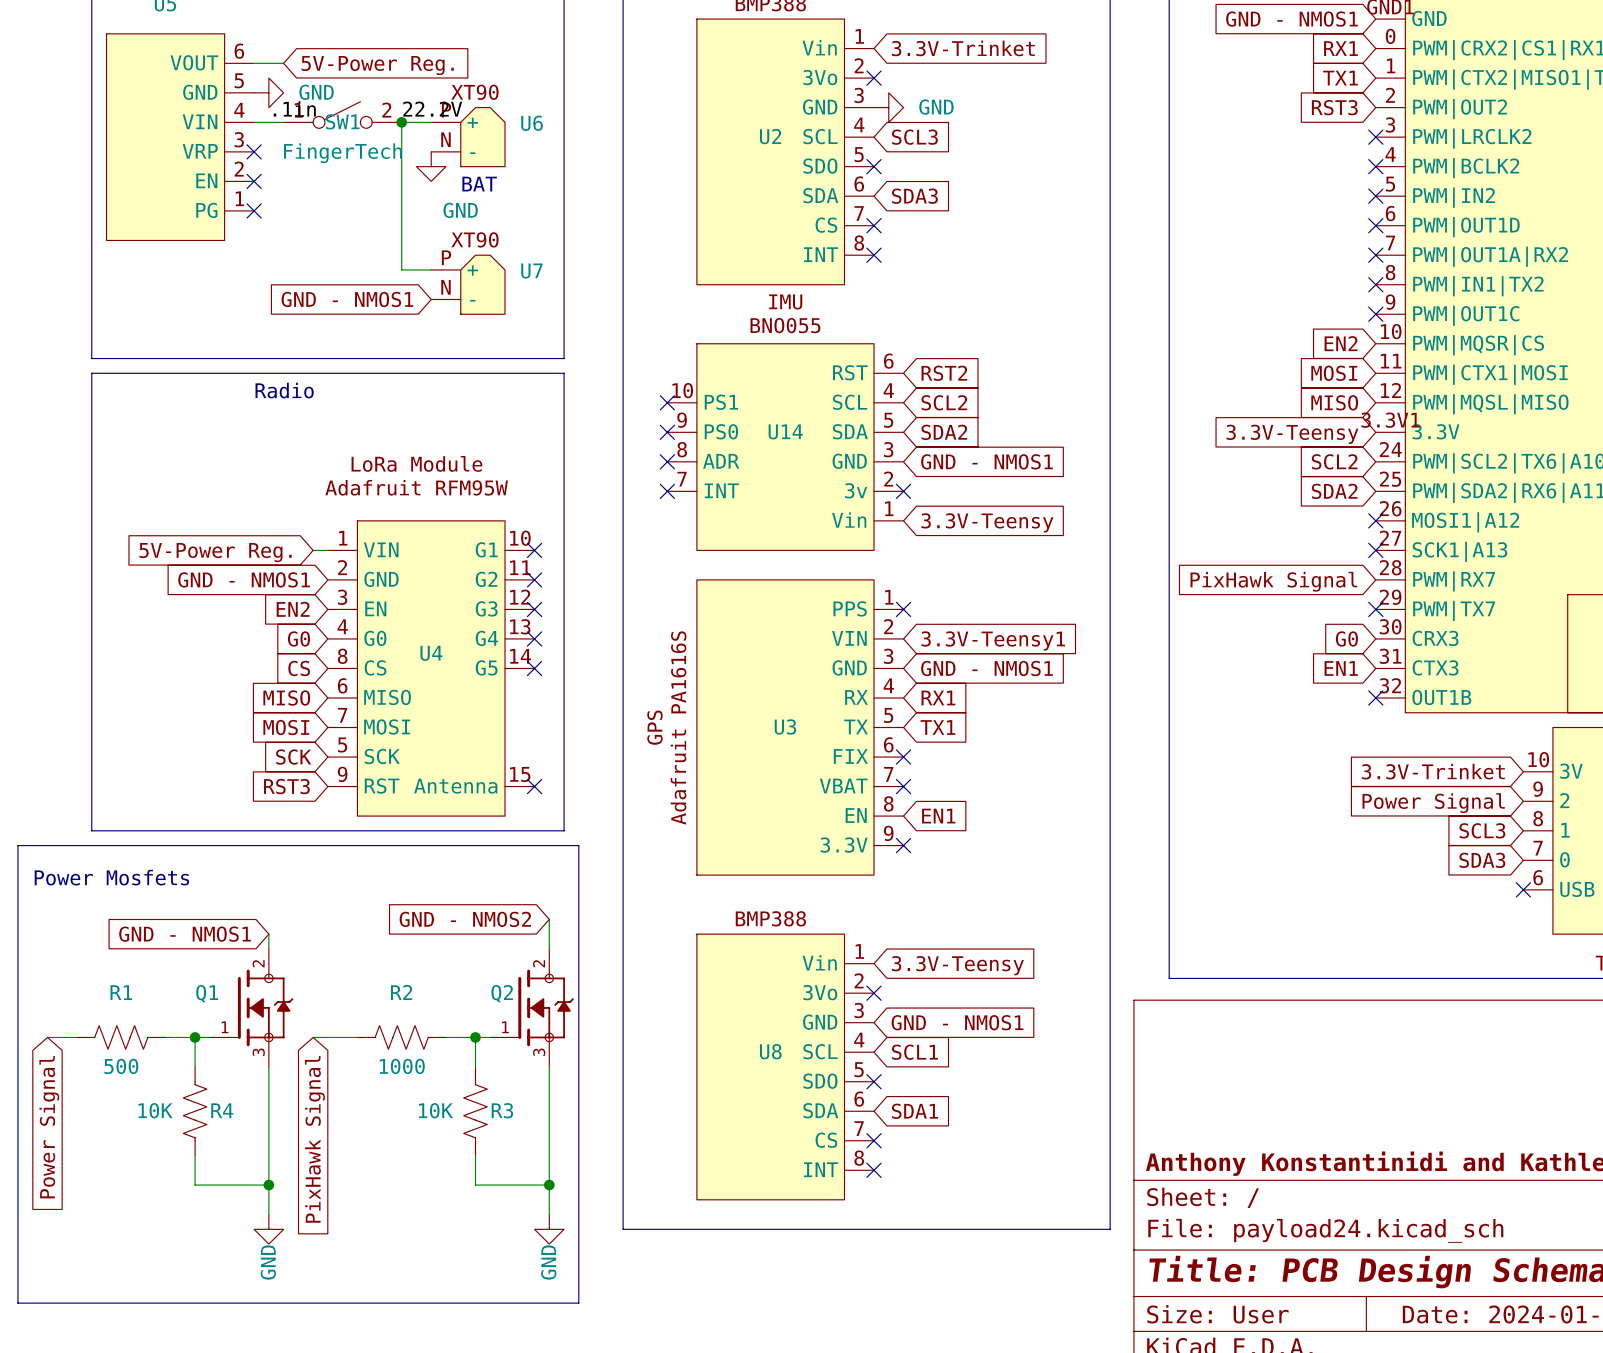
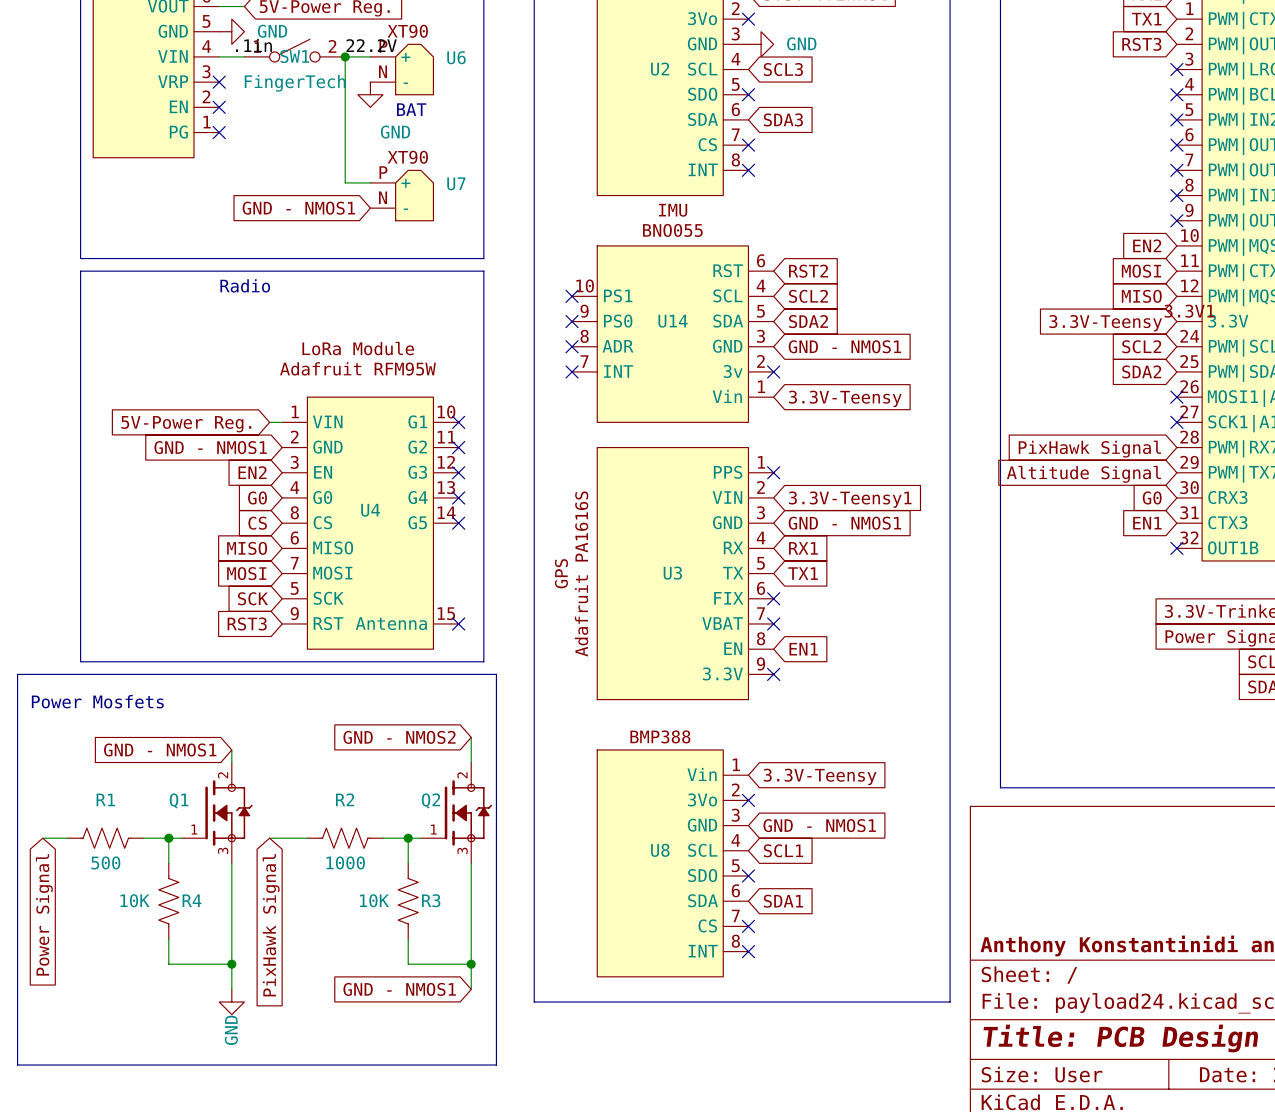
no-connect mark: (1375, 609) -> none
global label: none -> Altitude Signal (1083, 474)
global label: none -> GND - NMOS1 (399, 989)
power symbol: GND (549, 1229) -> none

